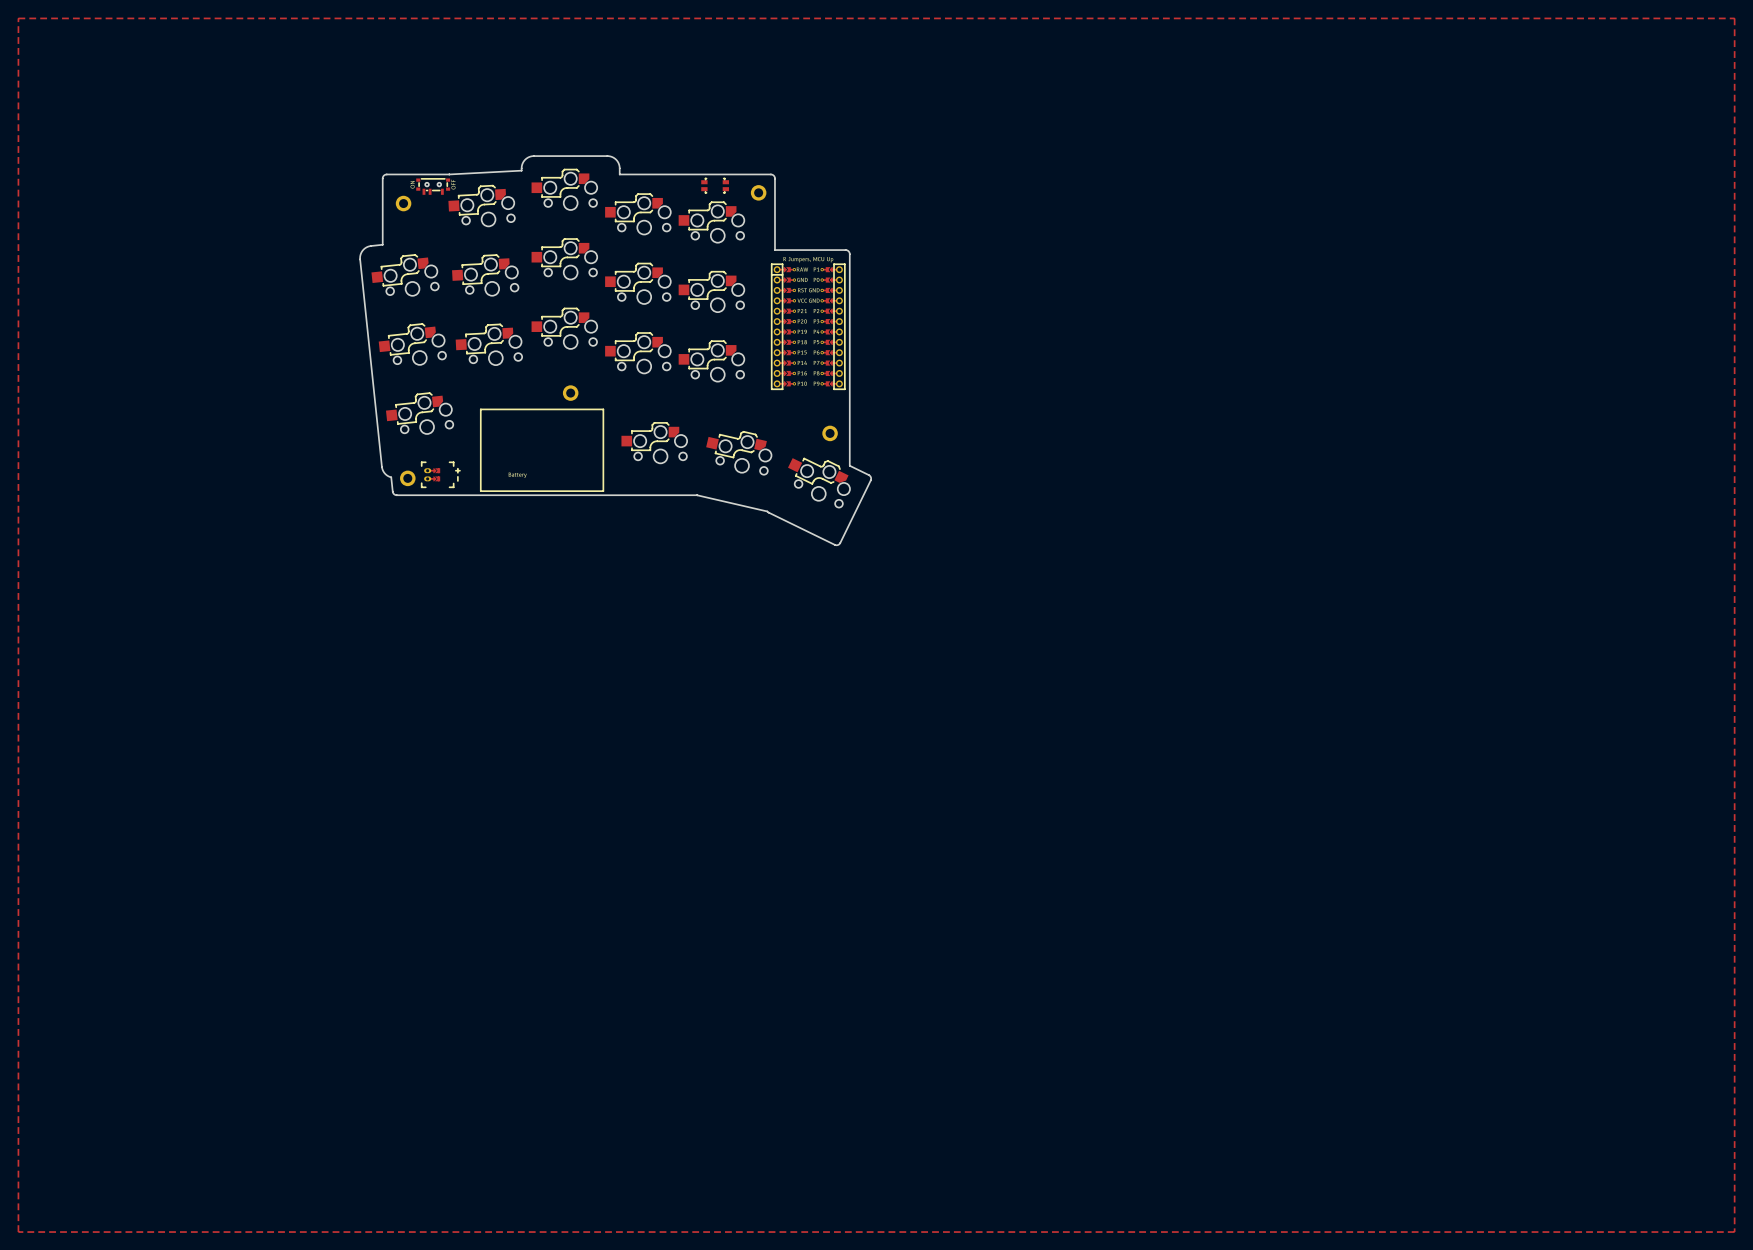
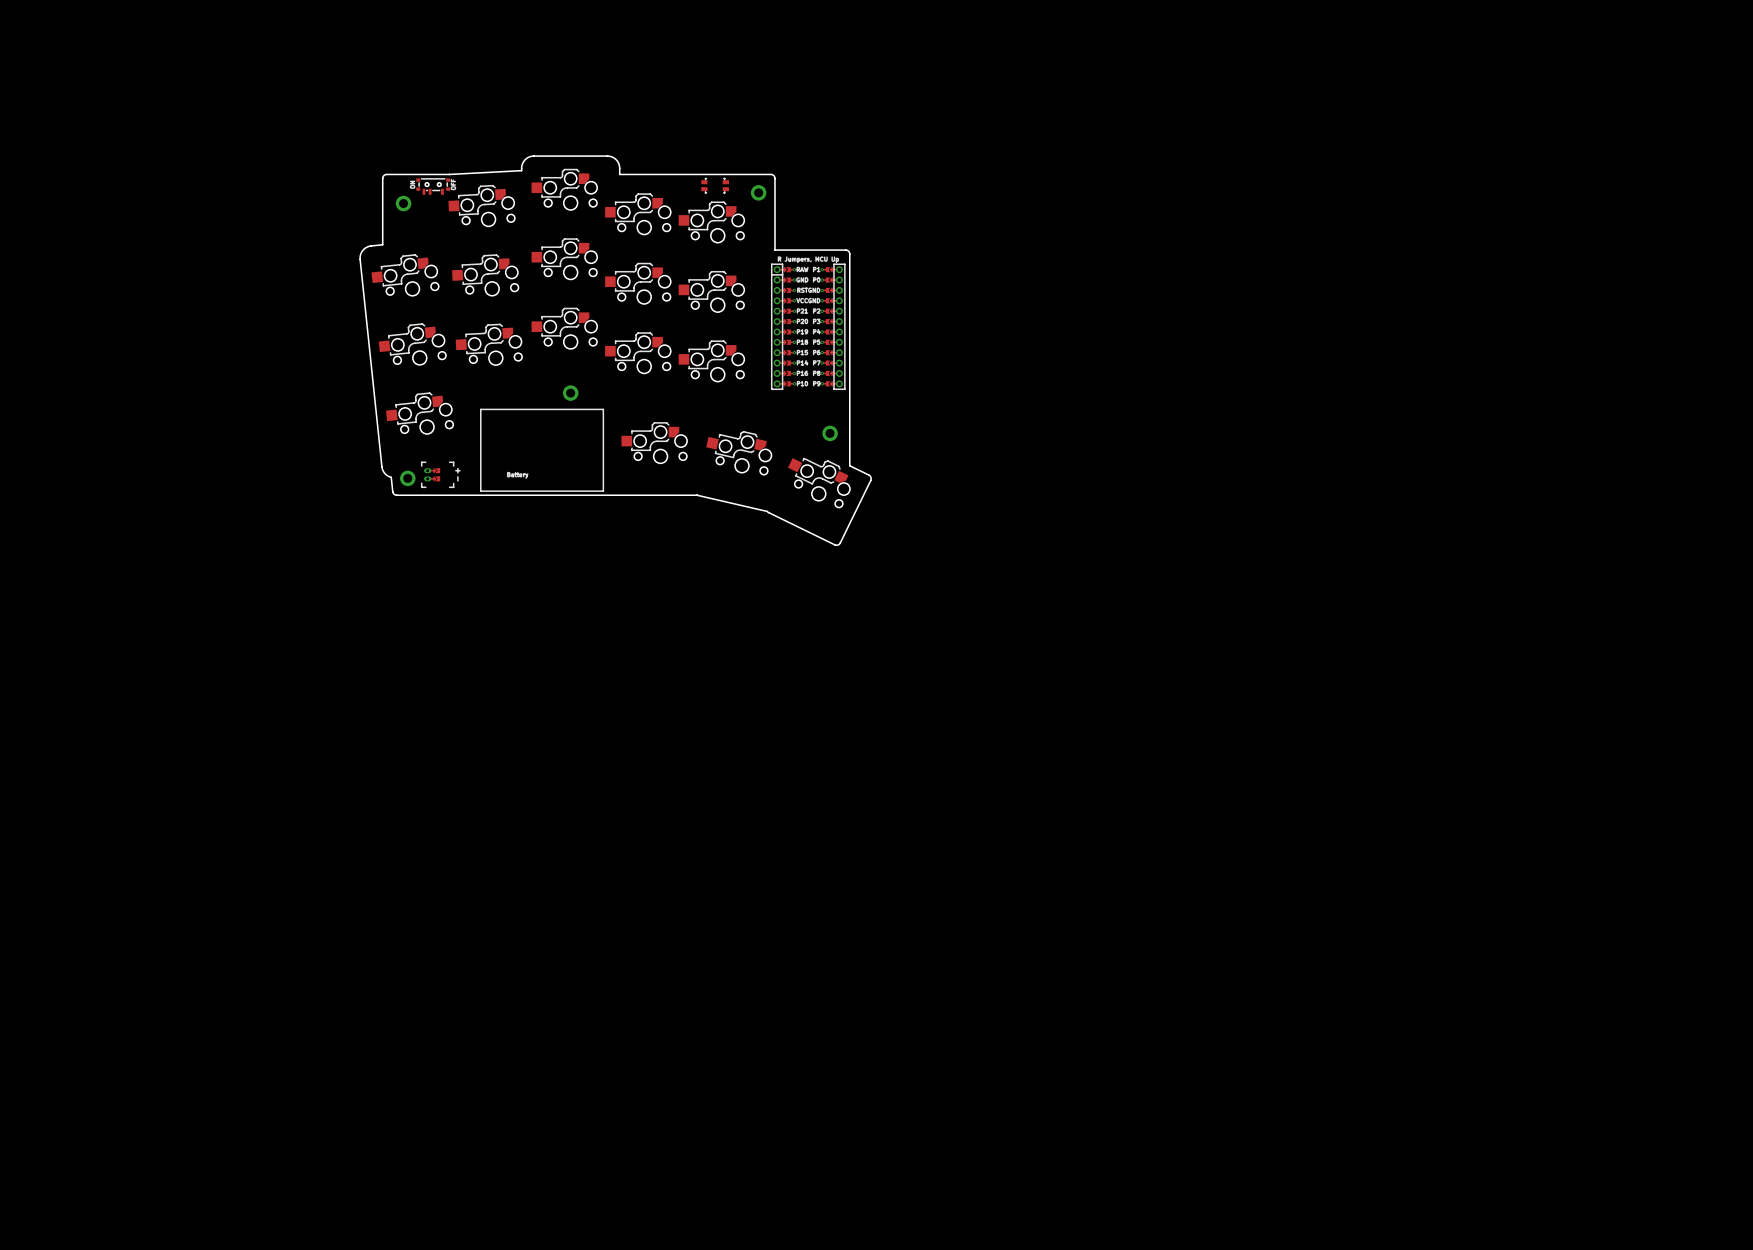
zone outline: (18, 18) (1734, 18) (1734, 1232) (18, 1232) (18, 18) -> none

